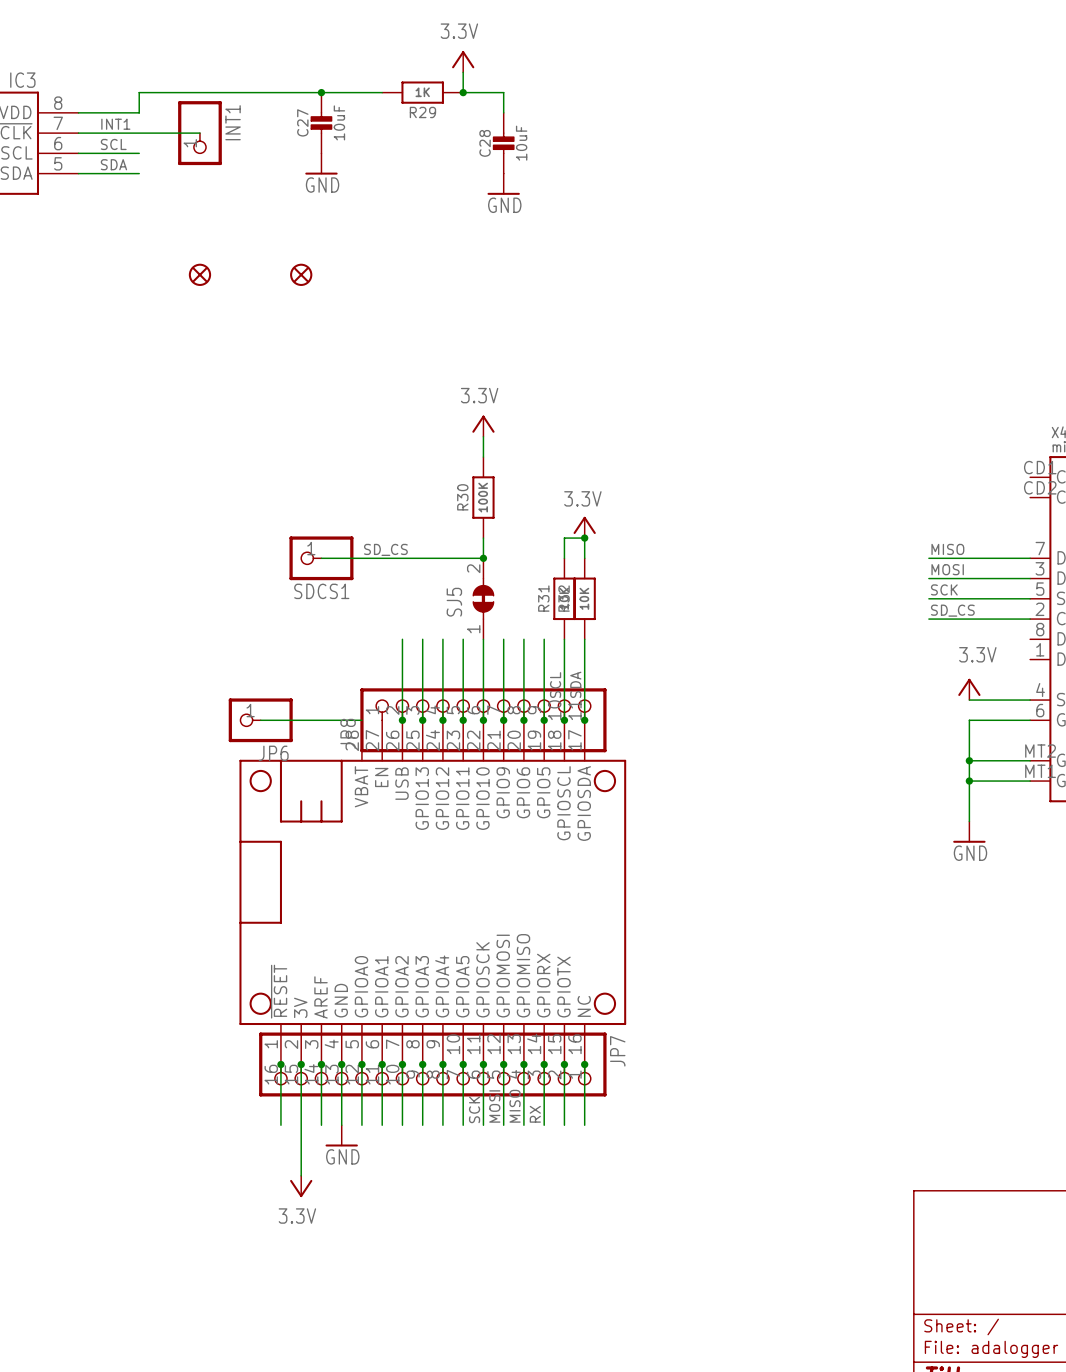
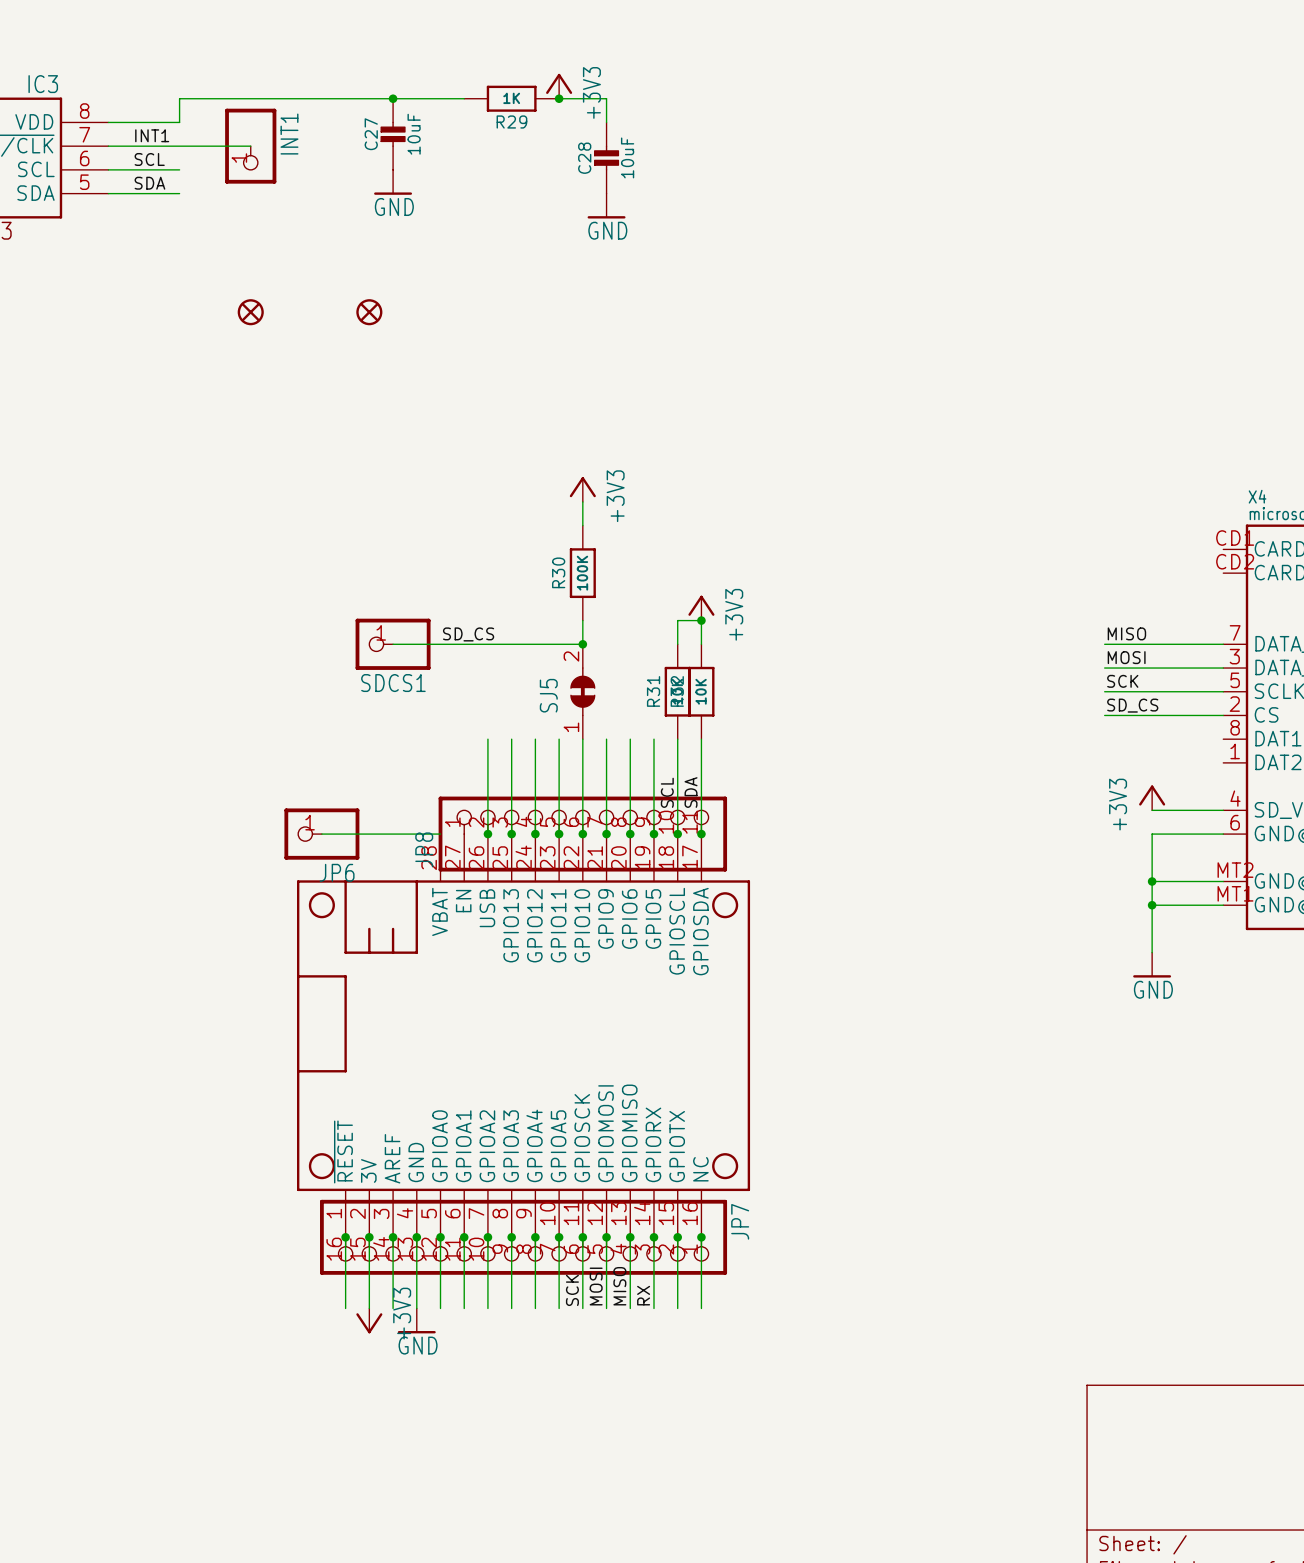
power symbol: 3.3V (463, 61) -> none
power symbol: none -> +3V3 (559, 86)
power symbol: 3.3V (483, 426) -> +3V3 (582, 489)
power symbol: 3.3V (584, 527) -> +3V3 (701, 608)
power symbol: 3.3V (969, 689) -> +3V3 (1152, 797)
wire: (301, 1125) (301, 1175) -> none
power symbol: none -> +3V3 (369, 1320)
power symbol: 3.3V (301, 1186) -> none

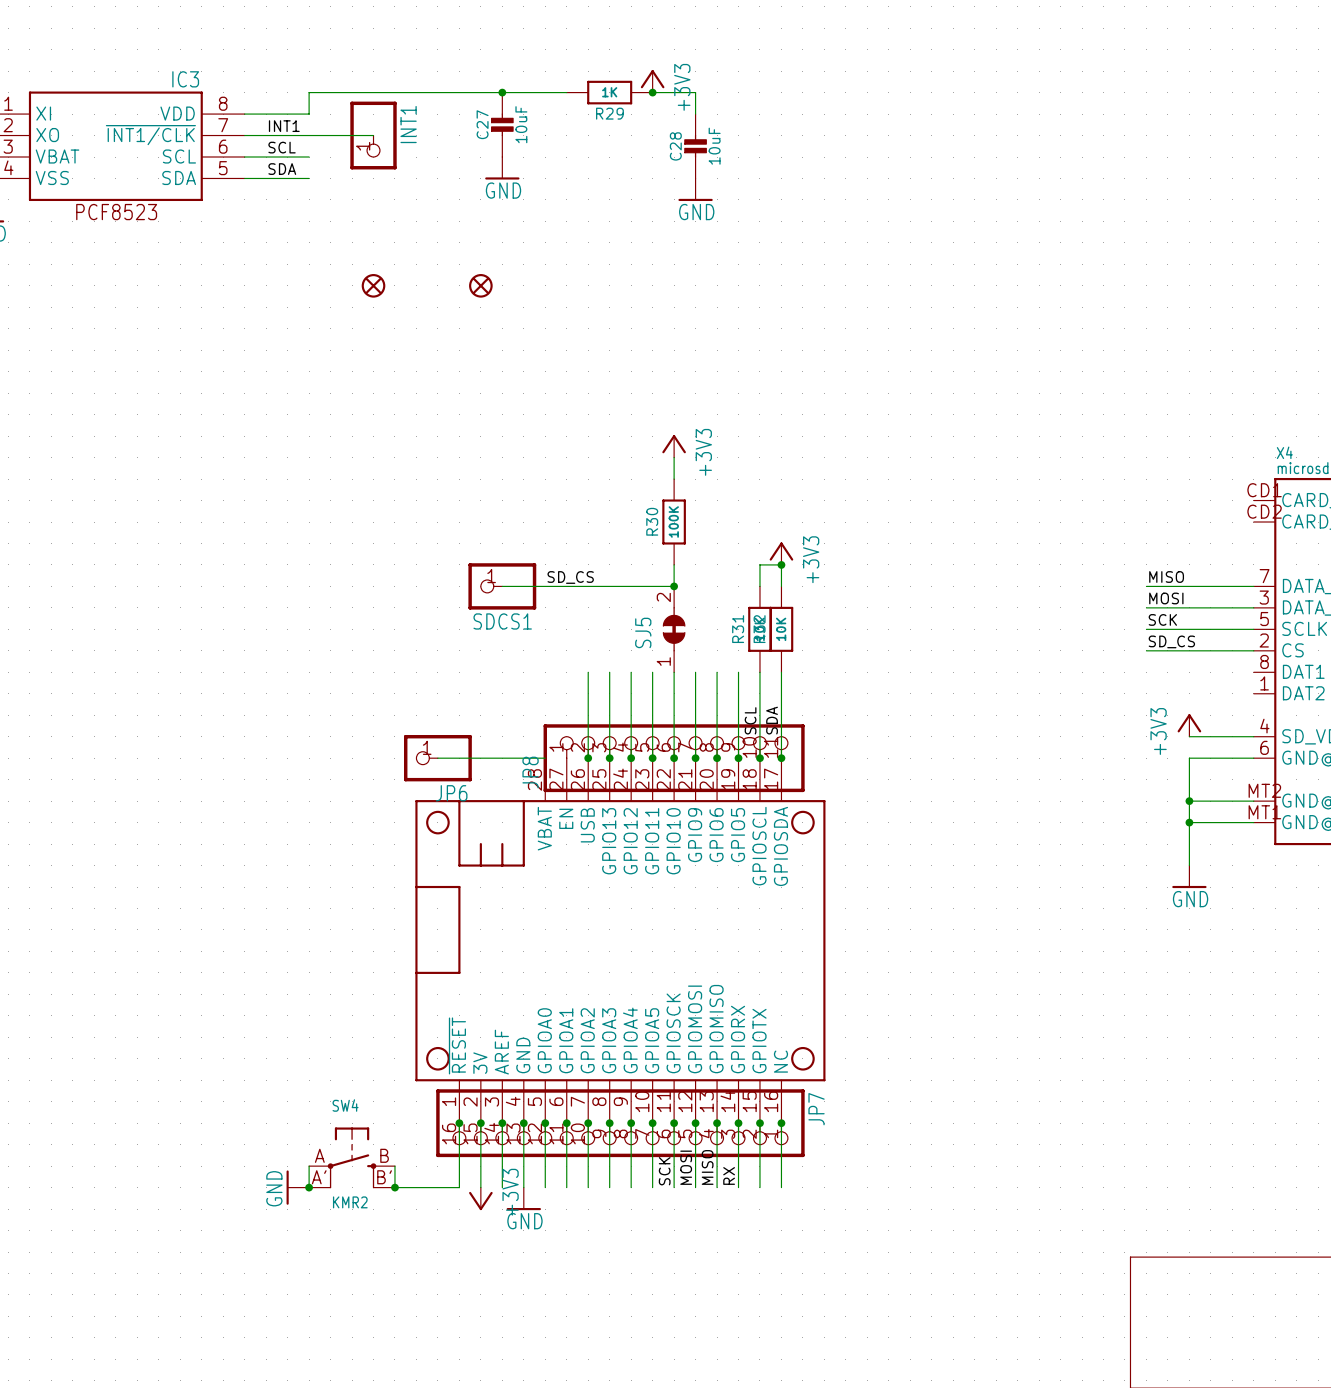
SW4: none -> KMR2 (352, 1157)
wire: none -> (309, 1166) (309, 1187)
wire: none -> (394, 1166) (394, 1187) (459, 1187)
power symbol: none -> GND (297, 1187)
junction: none -> (309, 1187)
junction: none -> (394, 1187)

